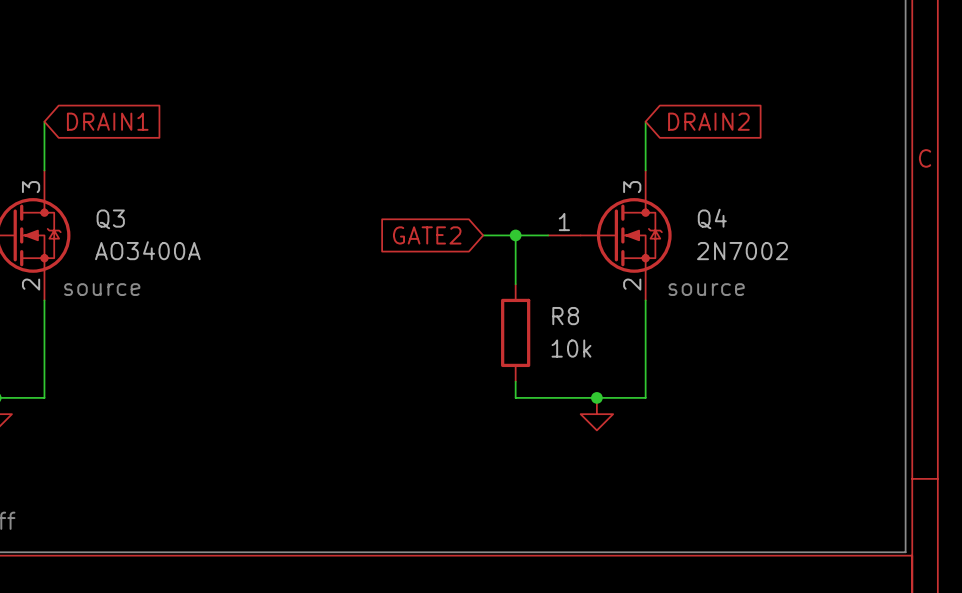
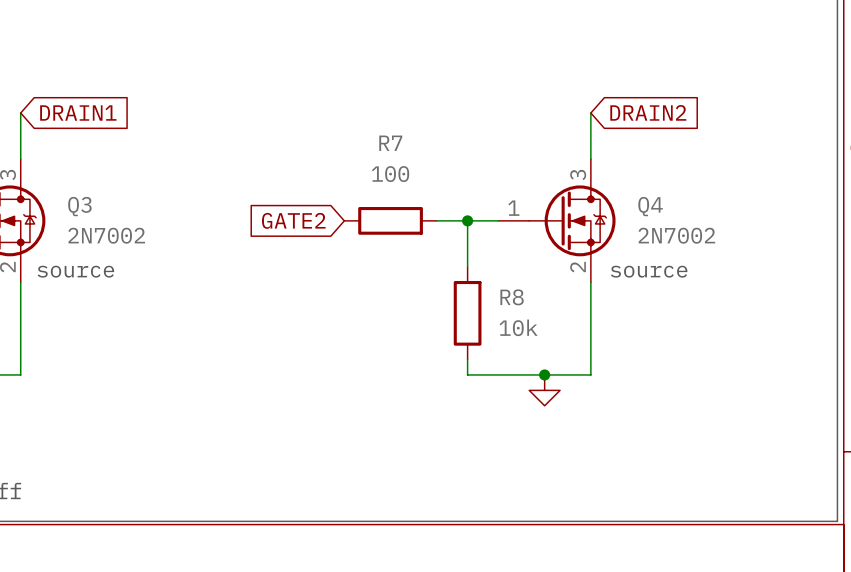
global label position: GATE2 (427, 235) -> GATE2 (293, 220)
R7: none -> 100 (390, 220)
Q3 value: AO3400A (147, 250) -> 2N7002 (106, 235)

